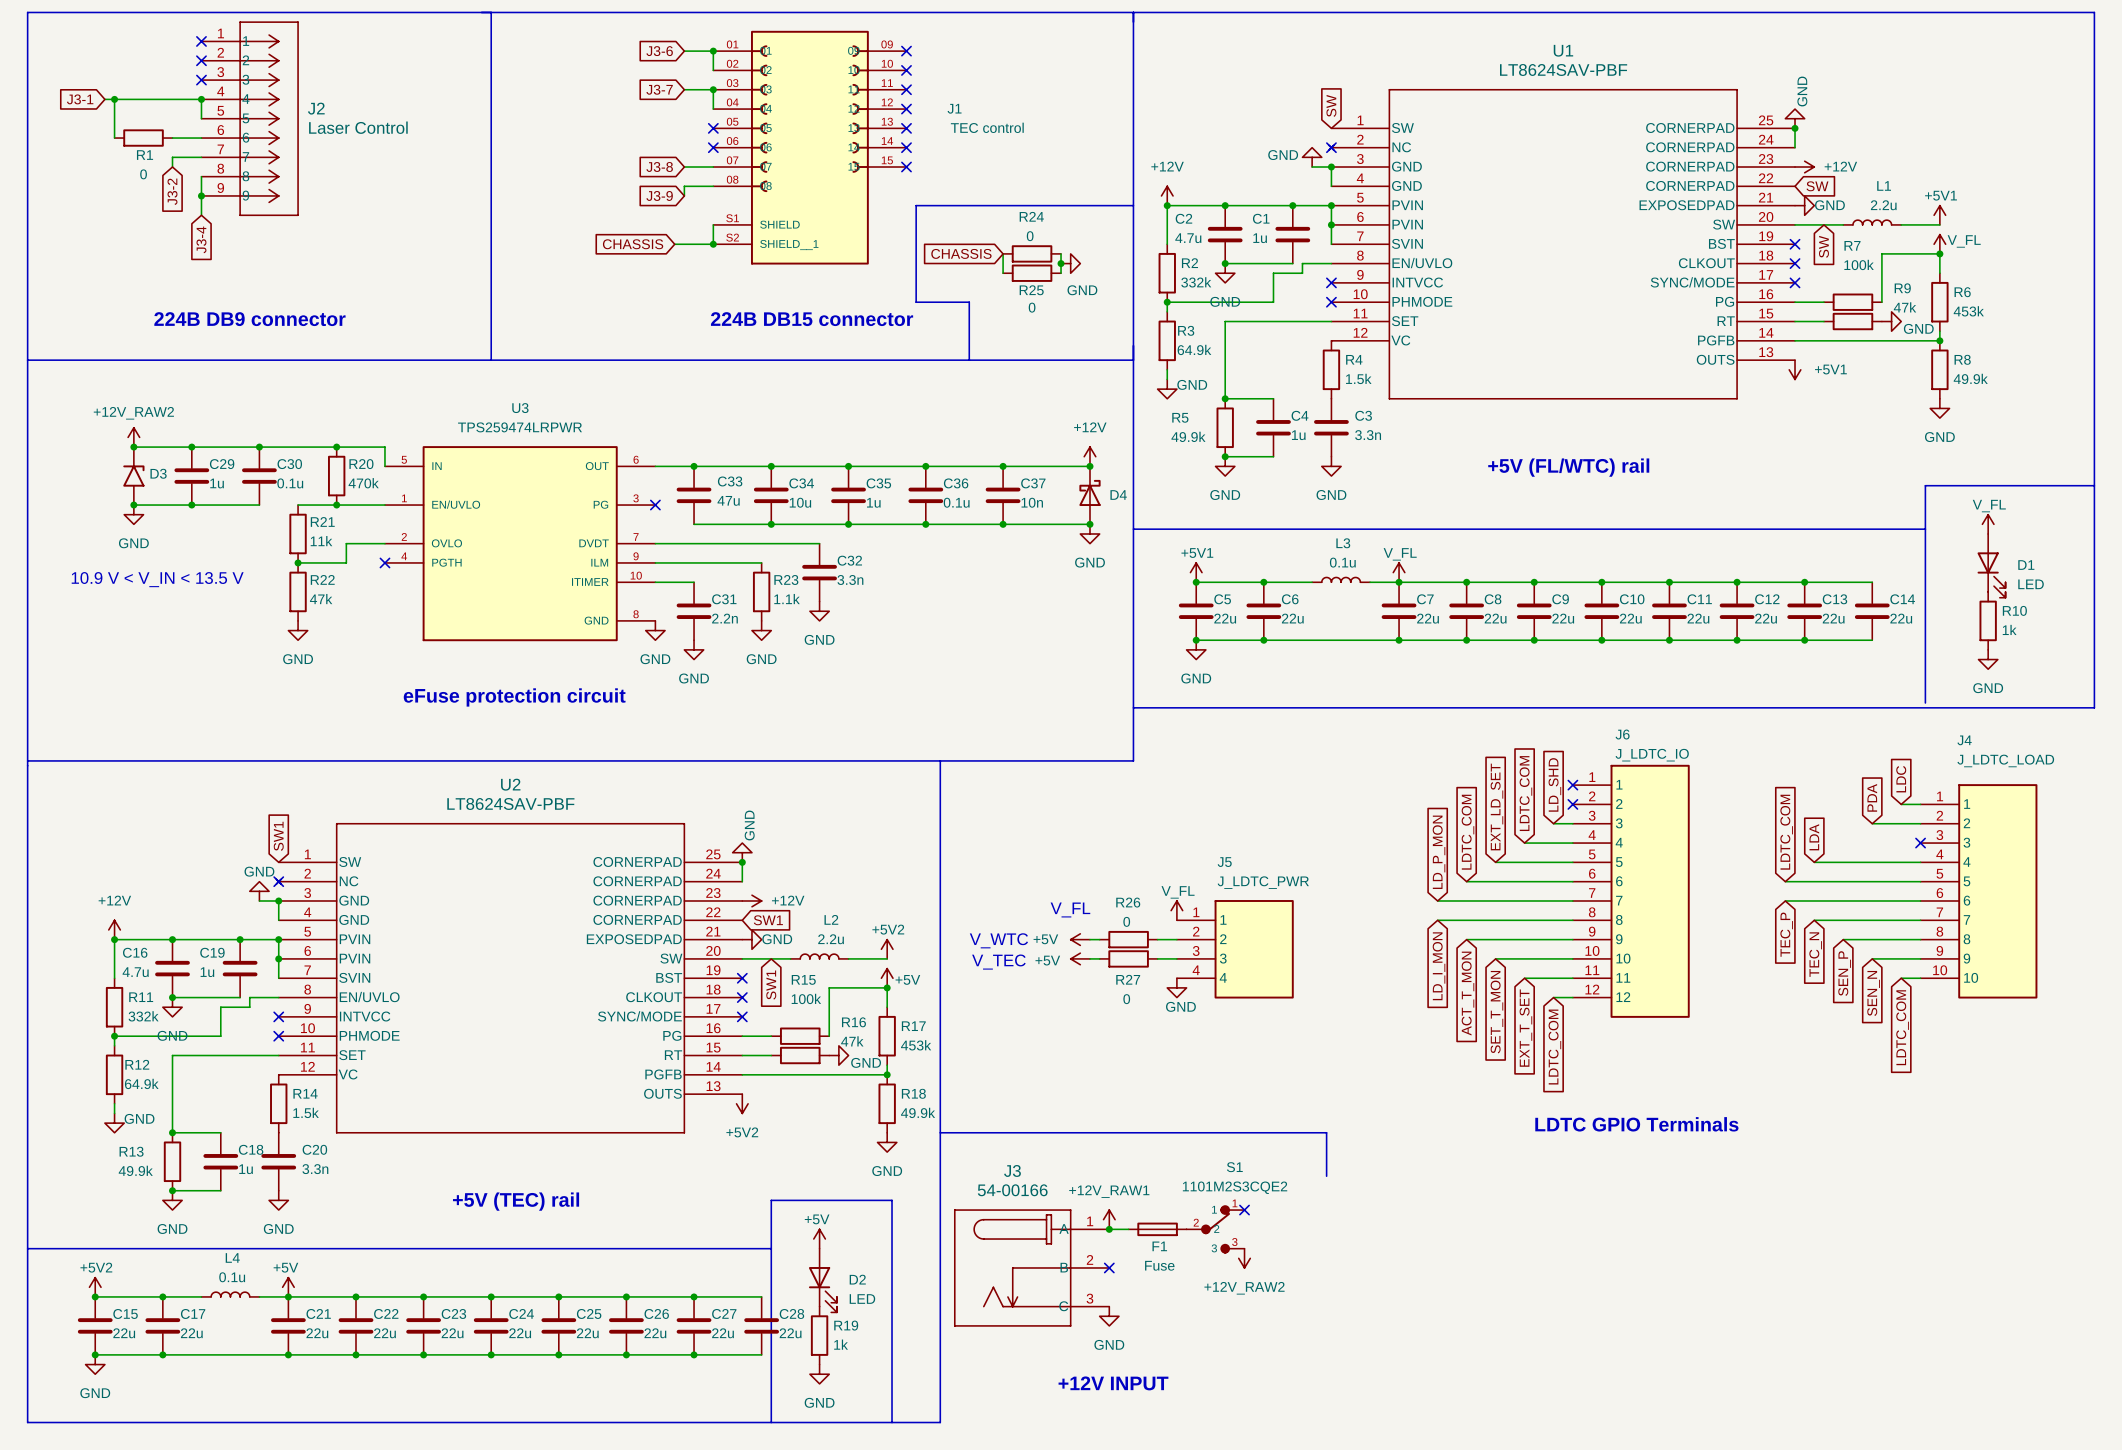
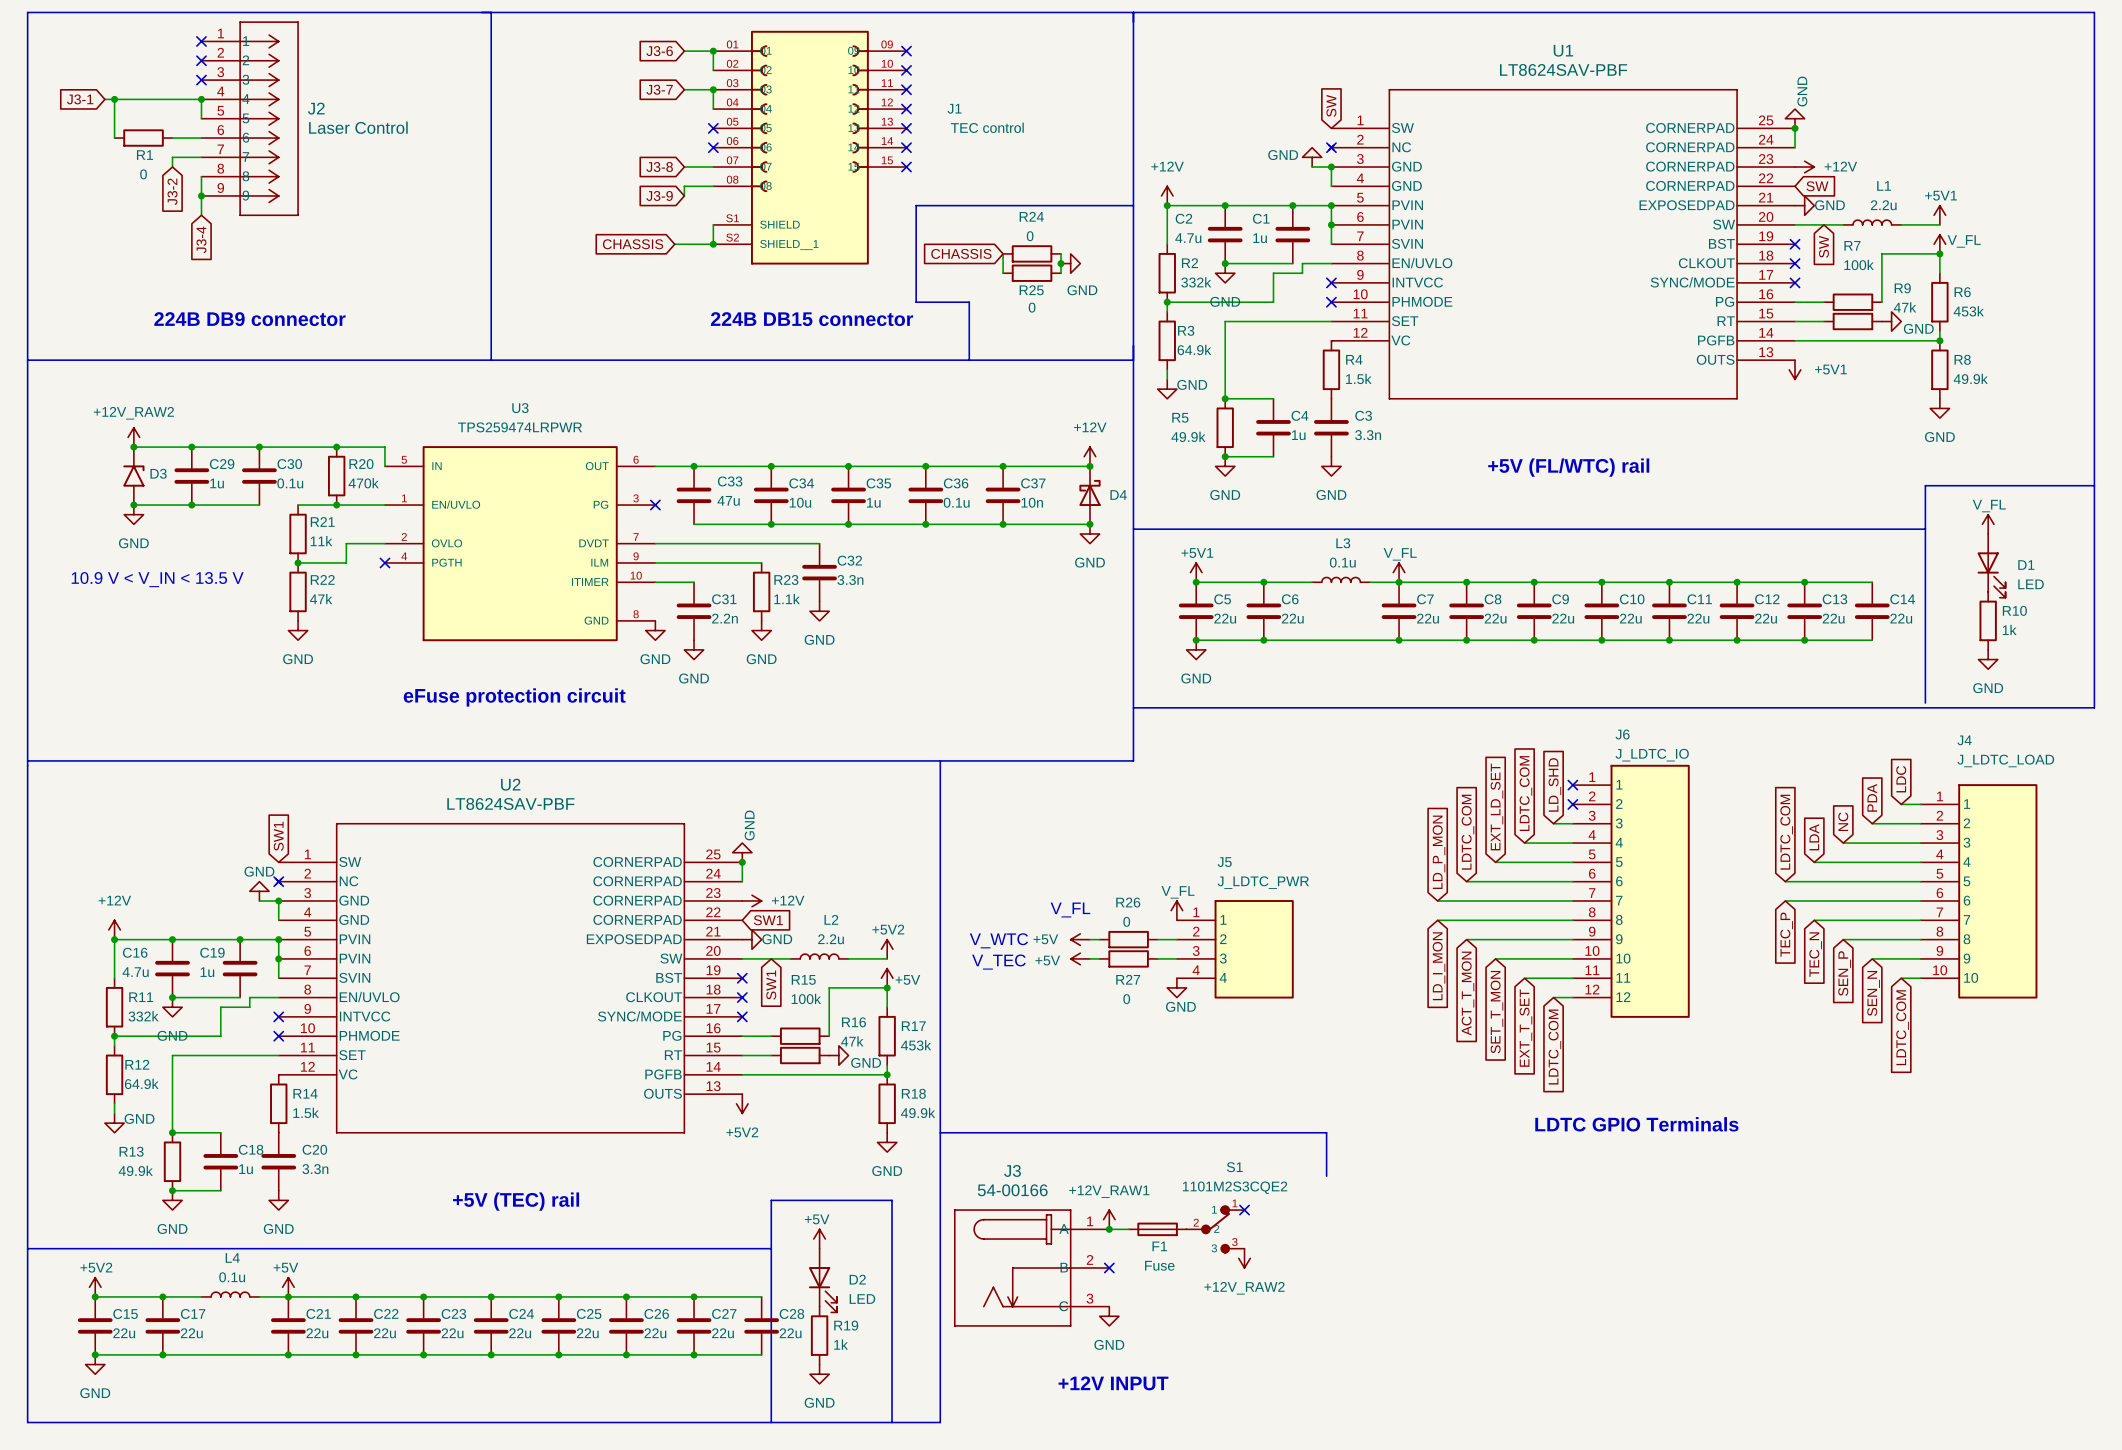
global label: none -> NC (1843, 821)
wire: none -> (1843, 843) (1920, 843)
no-connect mark: (1920, 843) -> none

